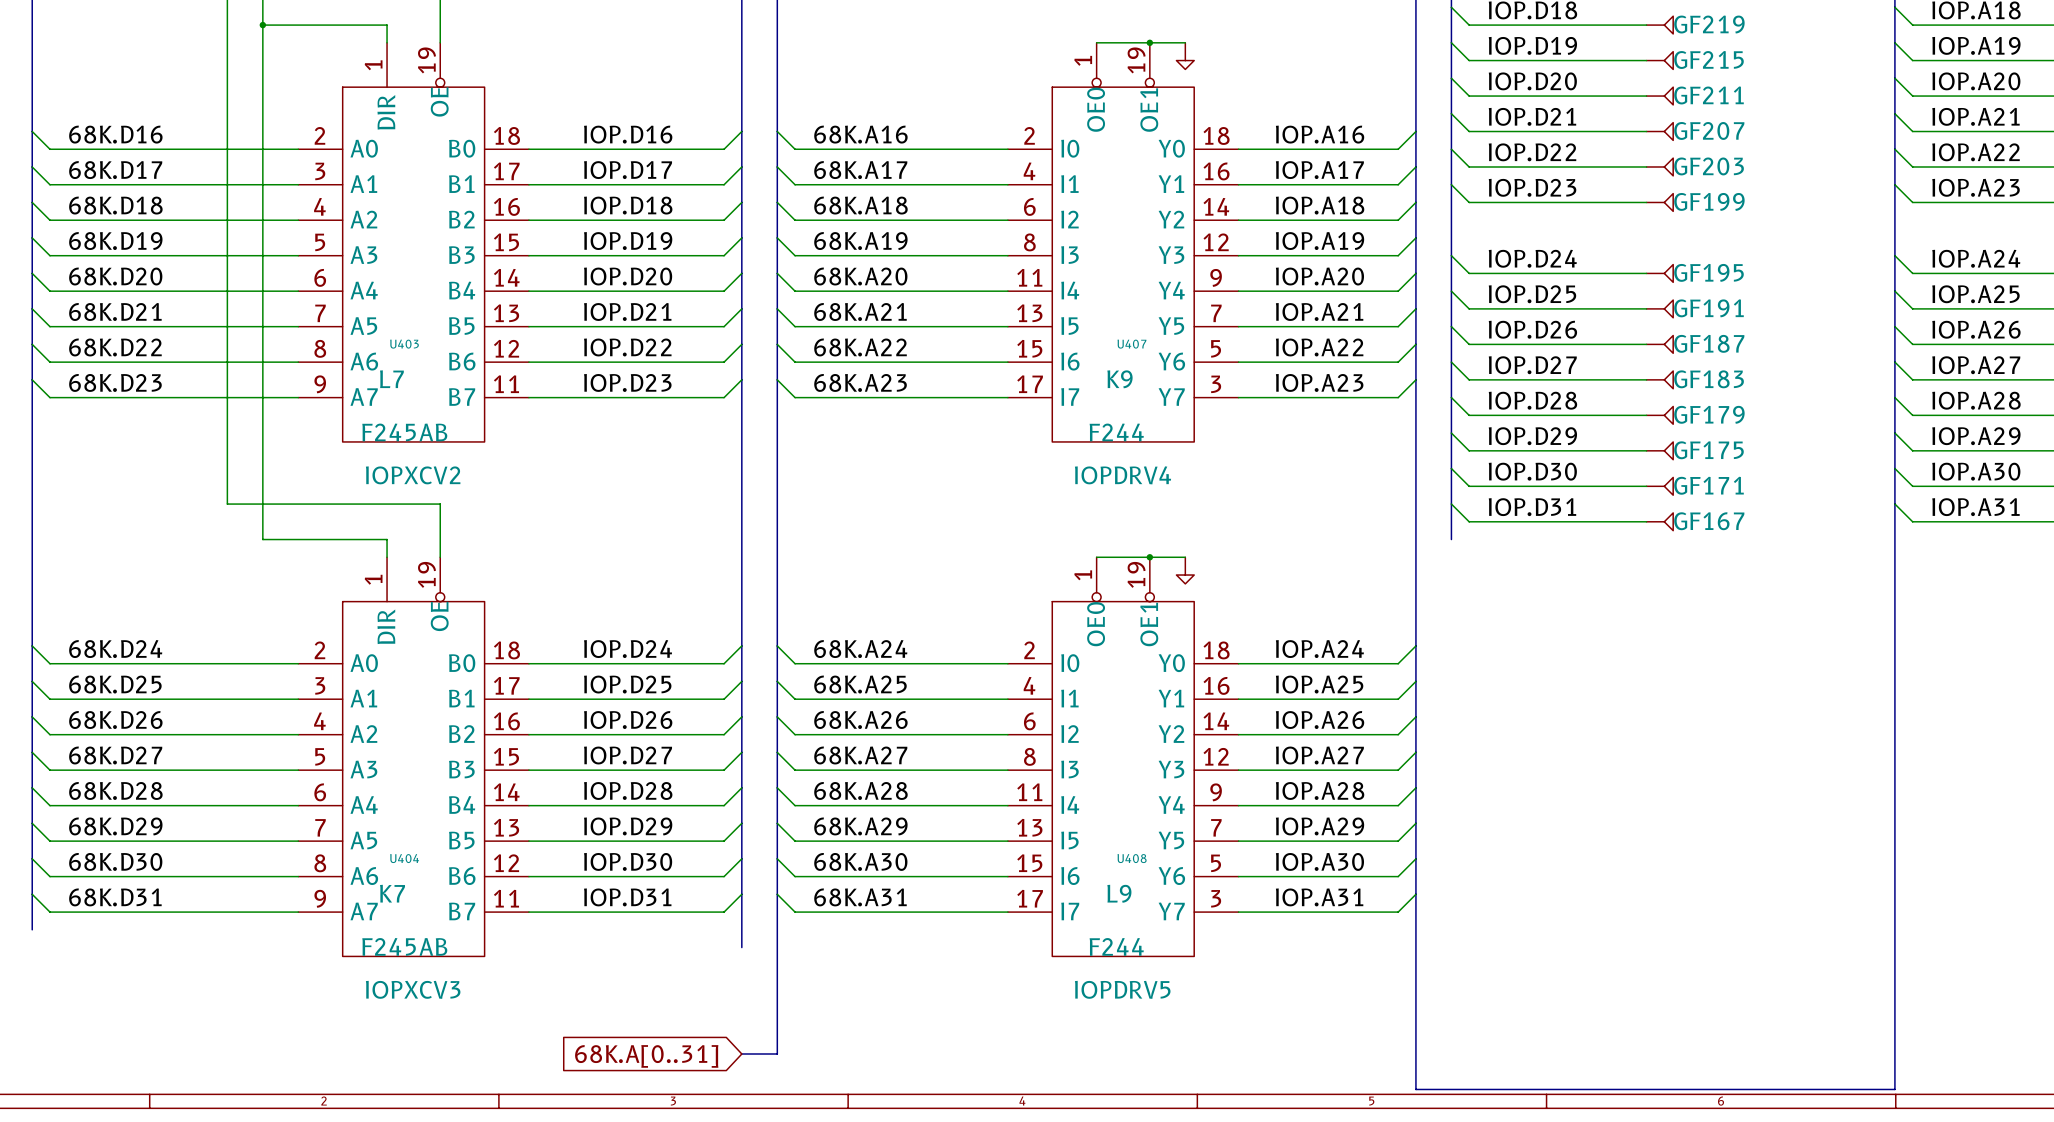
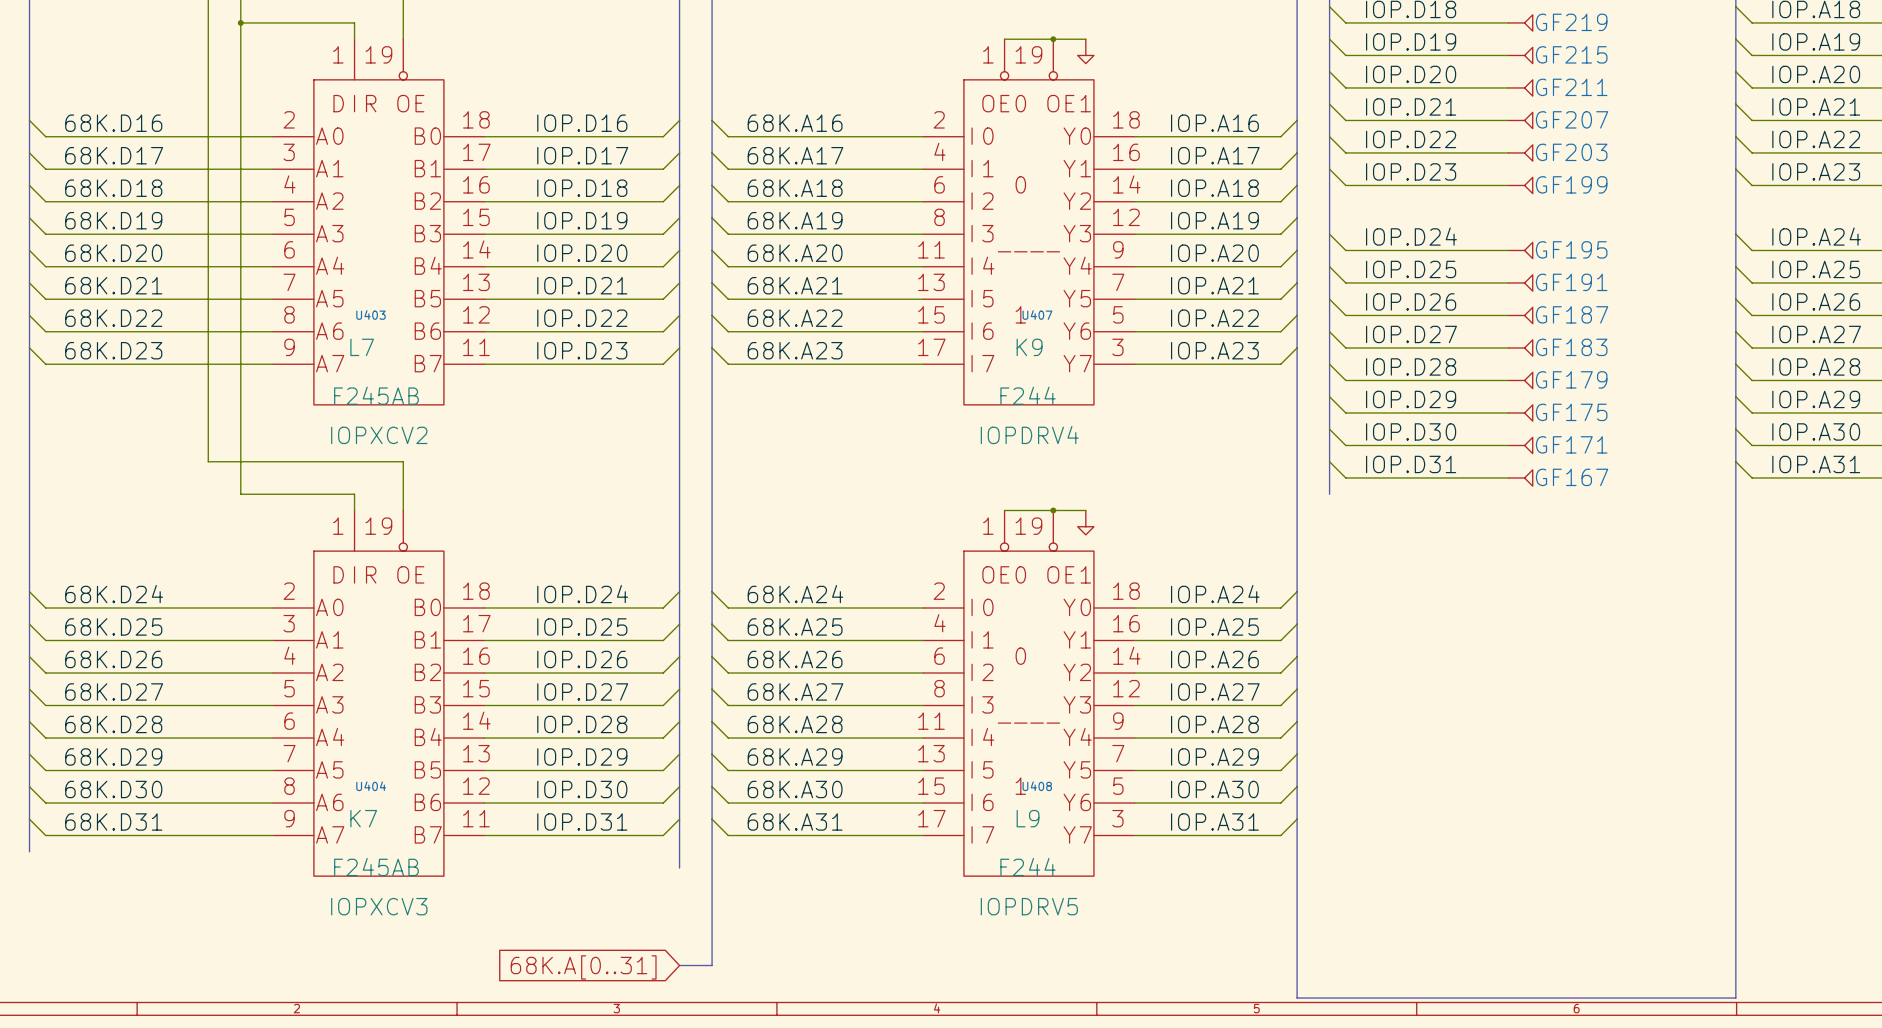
U403 symbol: [298, 42, 529, 442] -> [273, 39, 485, 405]
U407 symbol: [1007, 42, 1239, 442] -> [923, 39, 1135, 405]
U404 symbol: [298, 557, 529, 957] -> [273, 510, 485, 877]
U408 symbol: [1007, 557, 1239, 957] -> [923, 510, 1135, 877]

